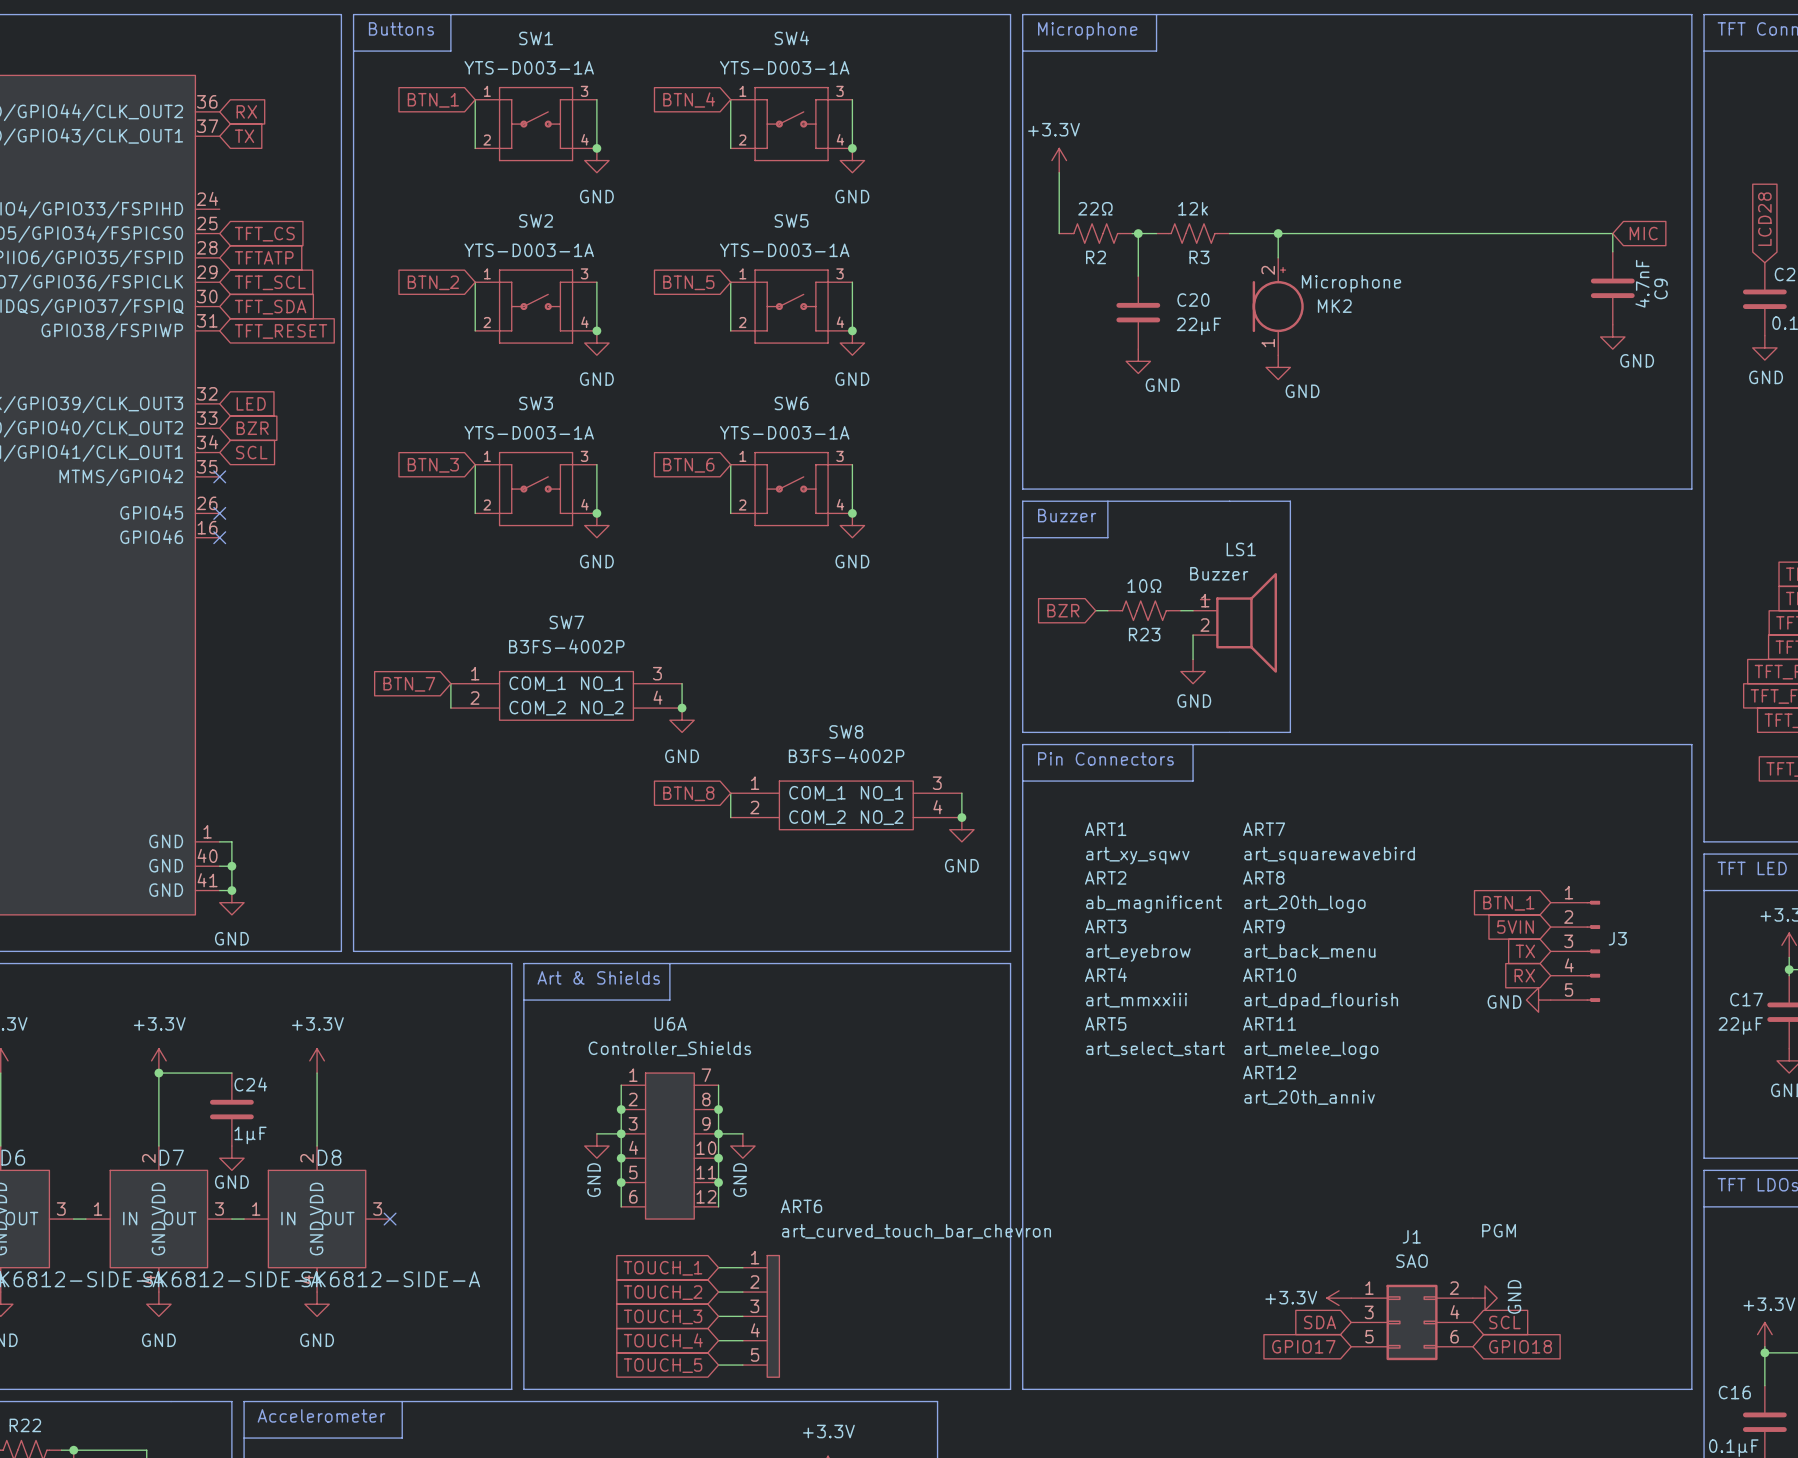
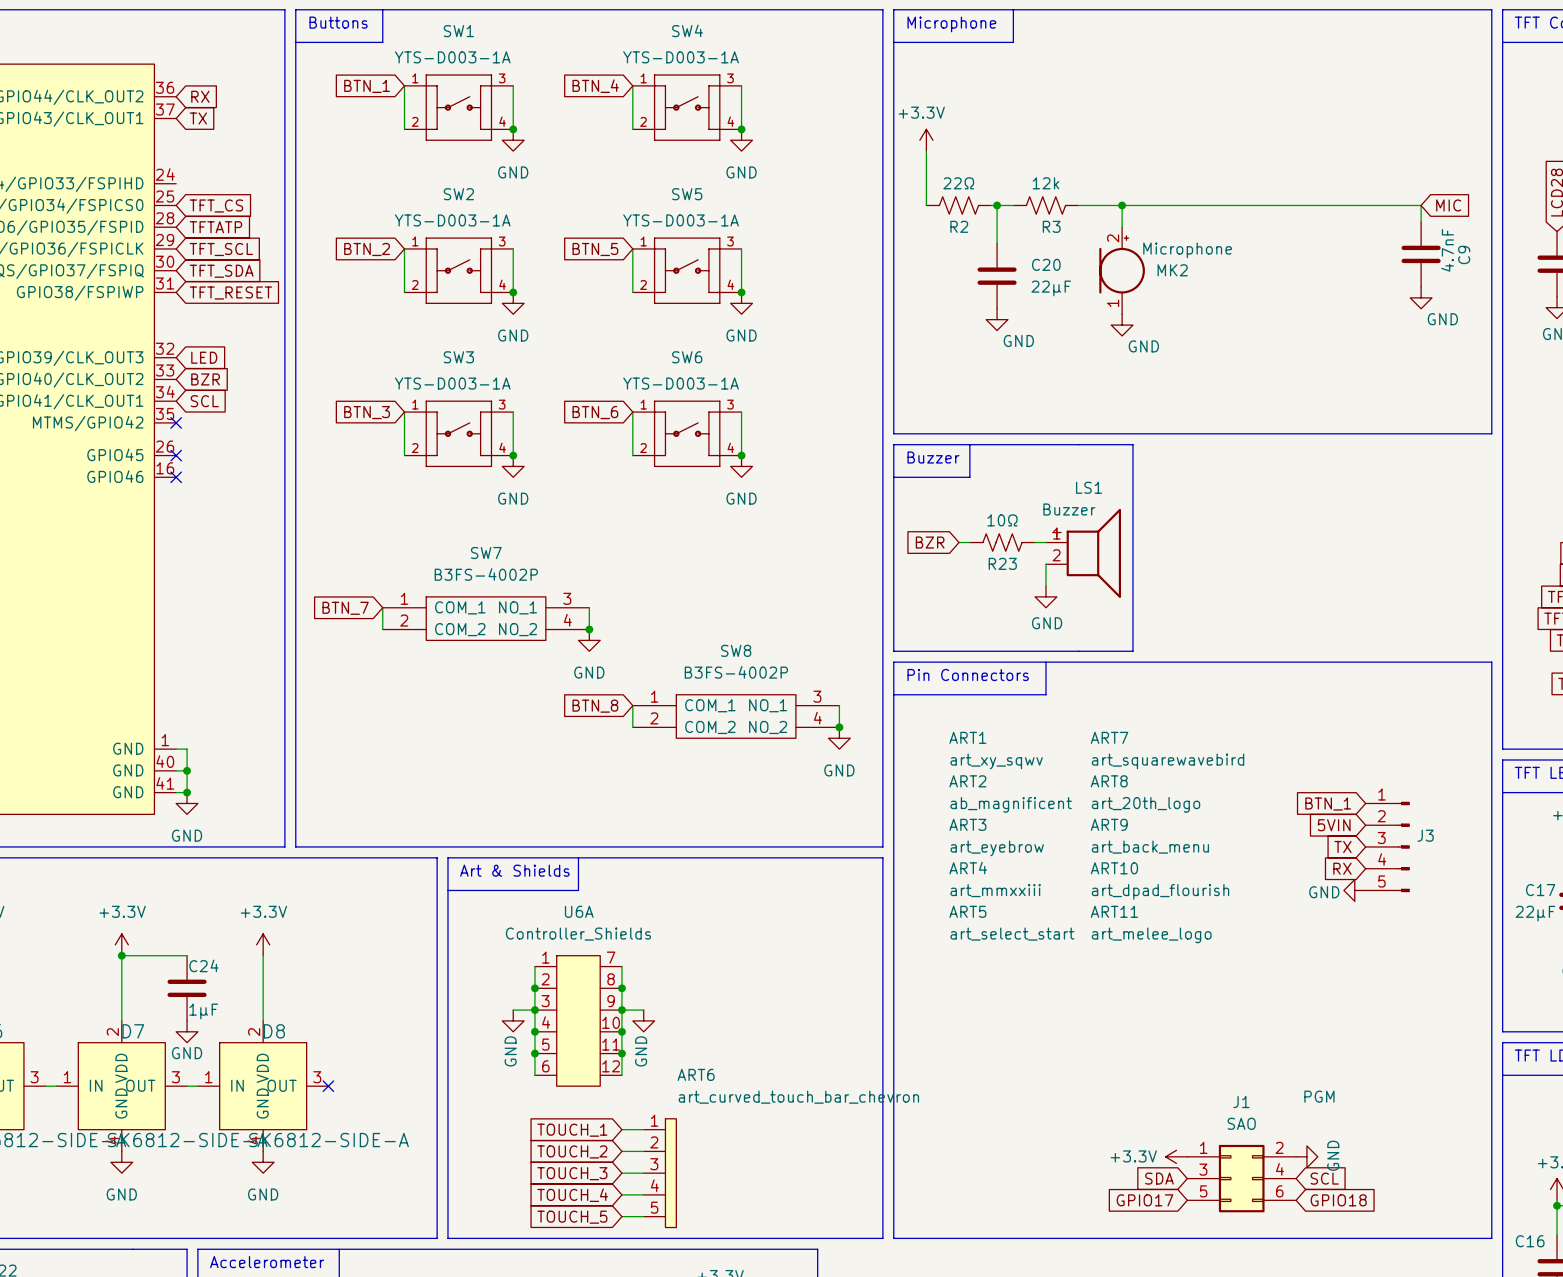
ART12: art_20th_anniv (1309, 1085) -> none

